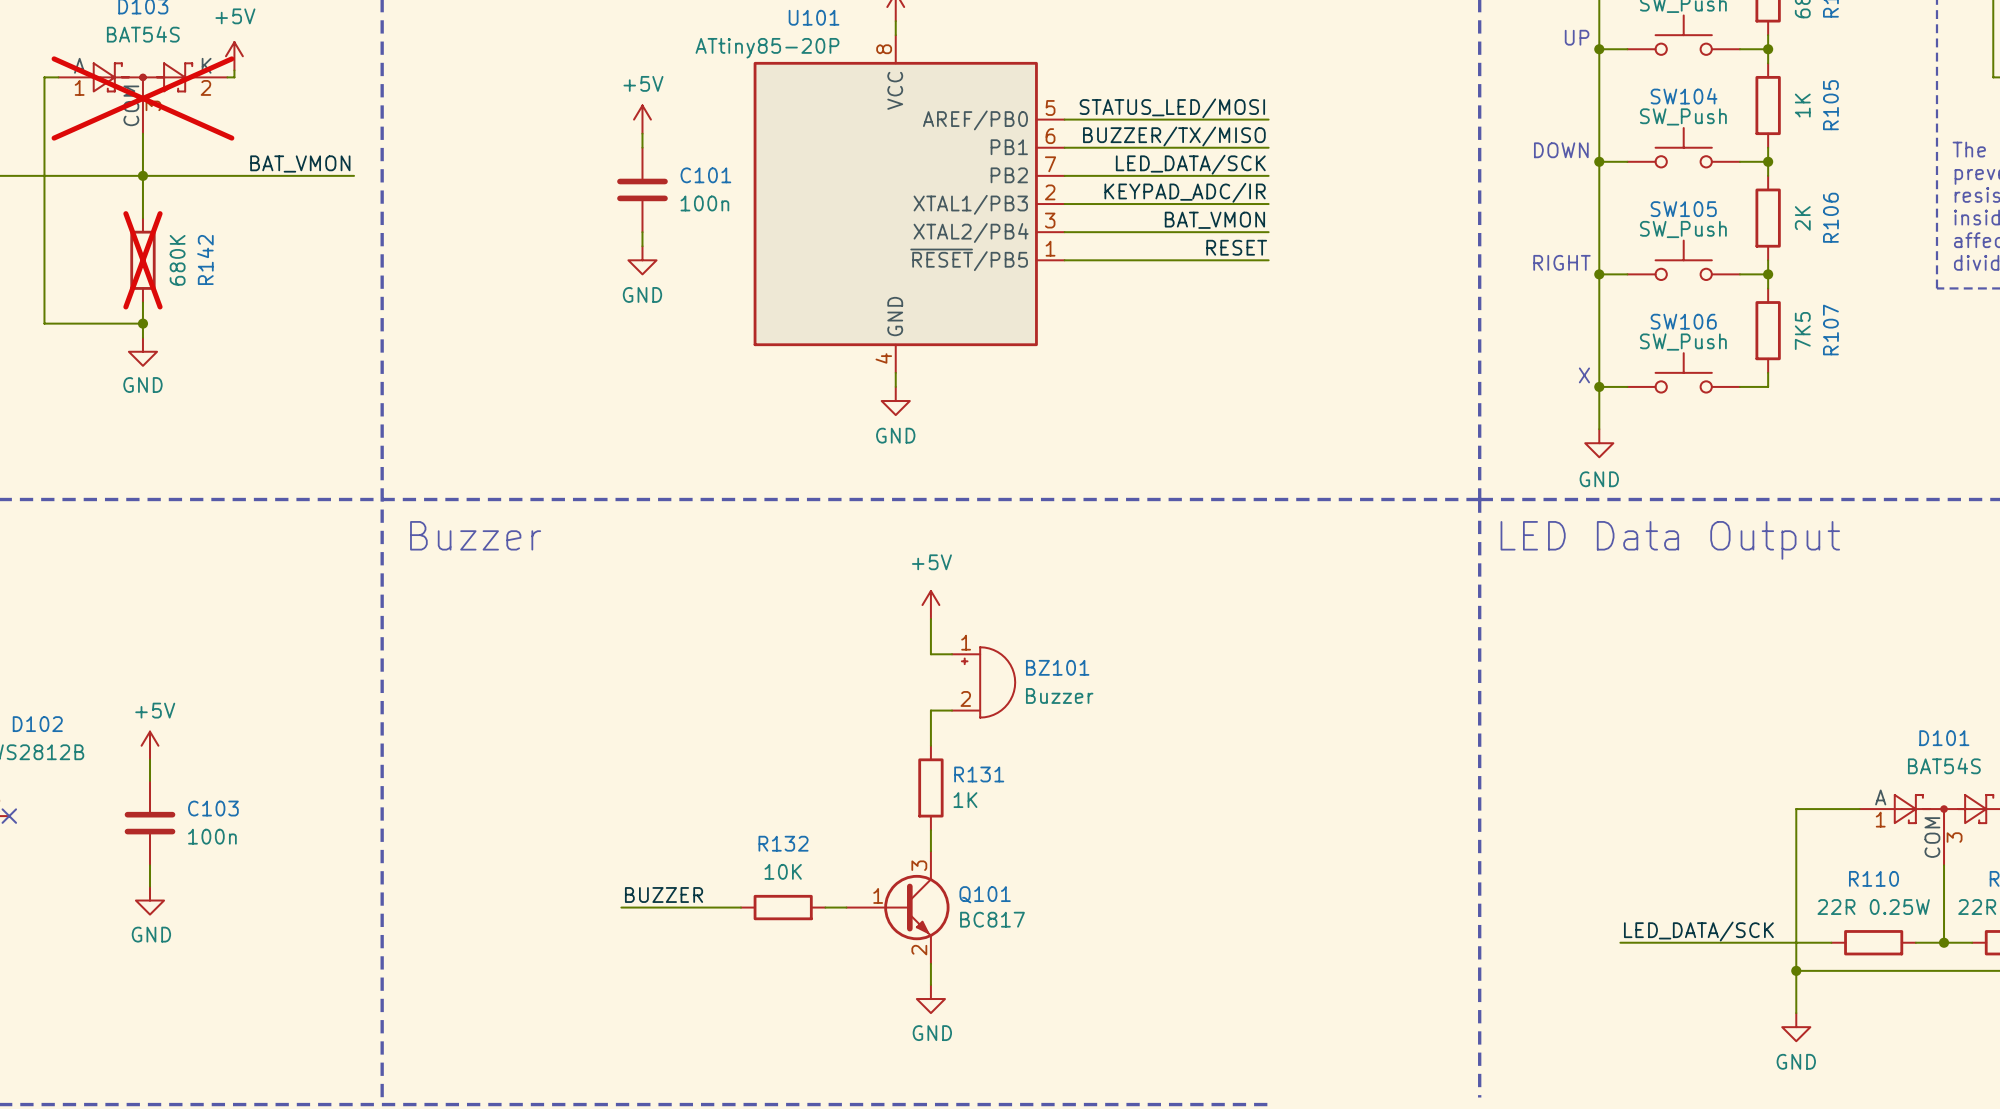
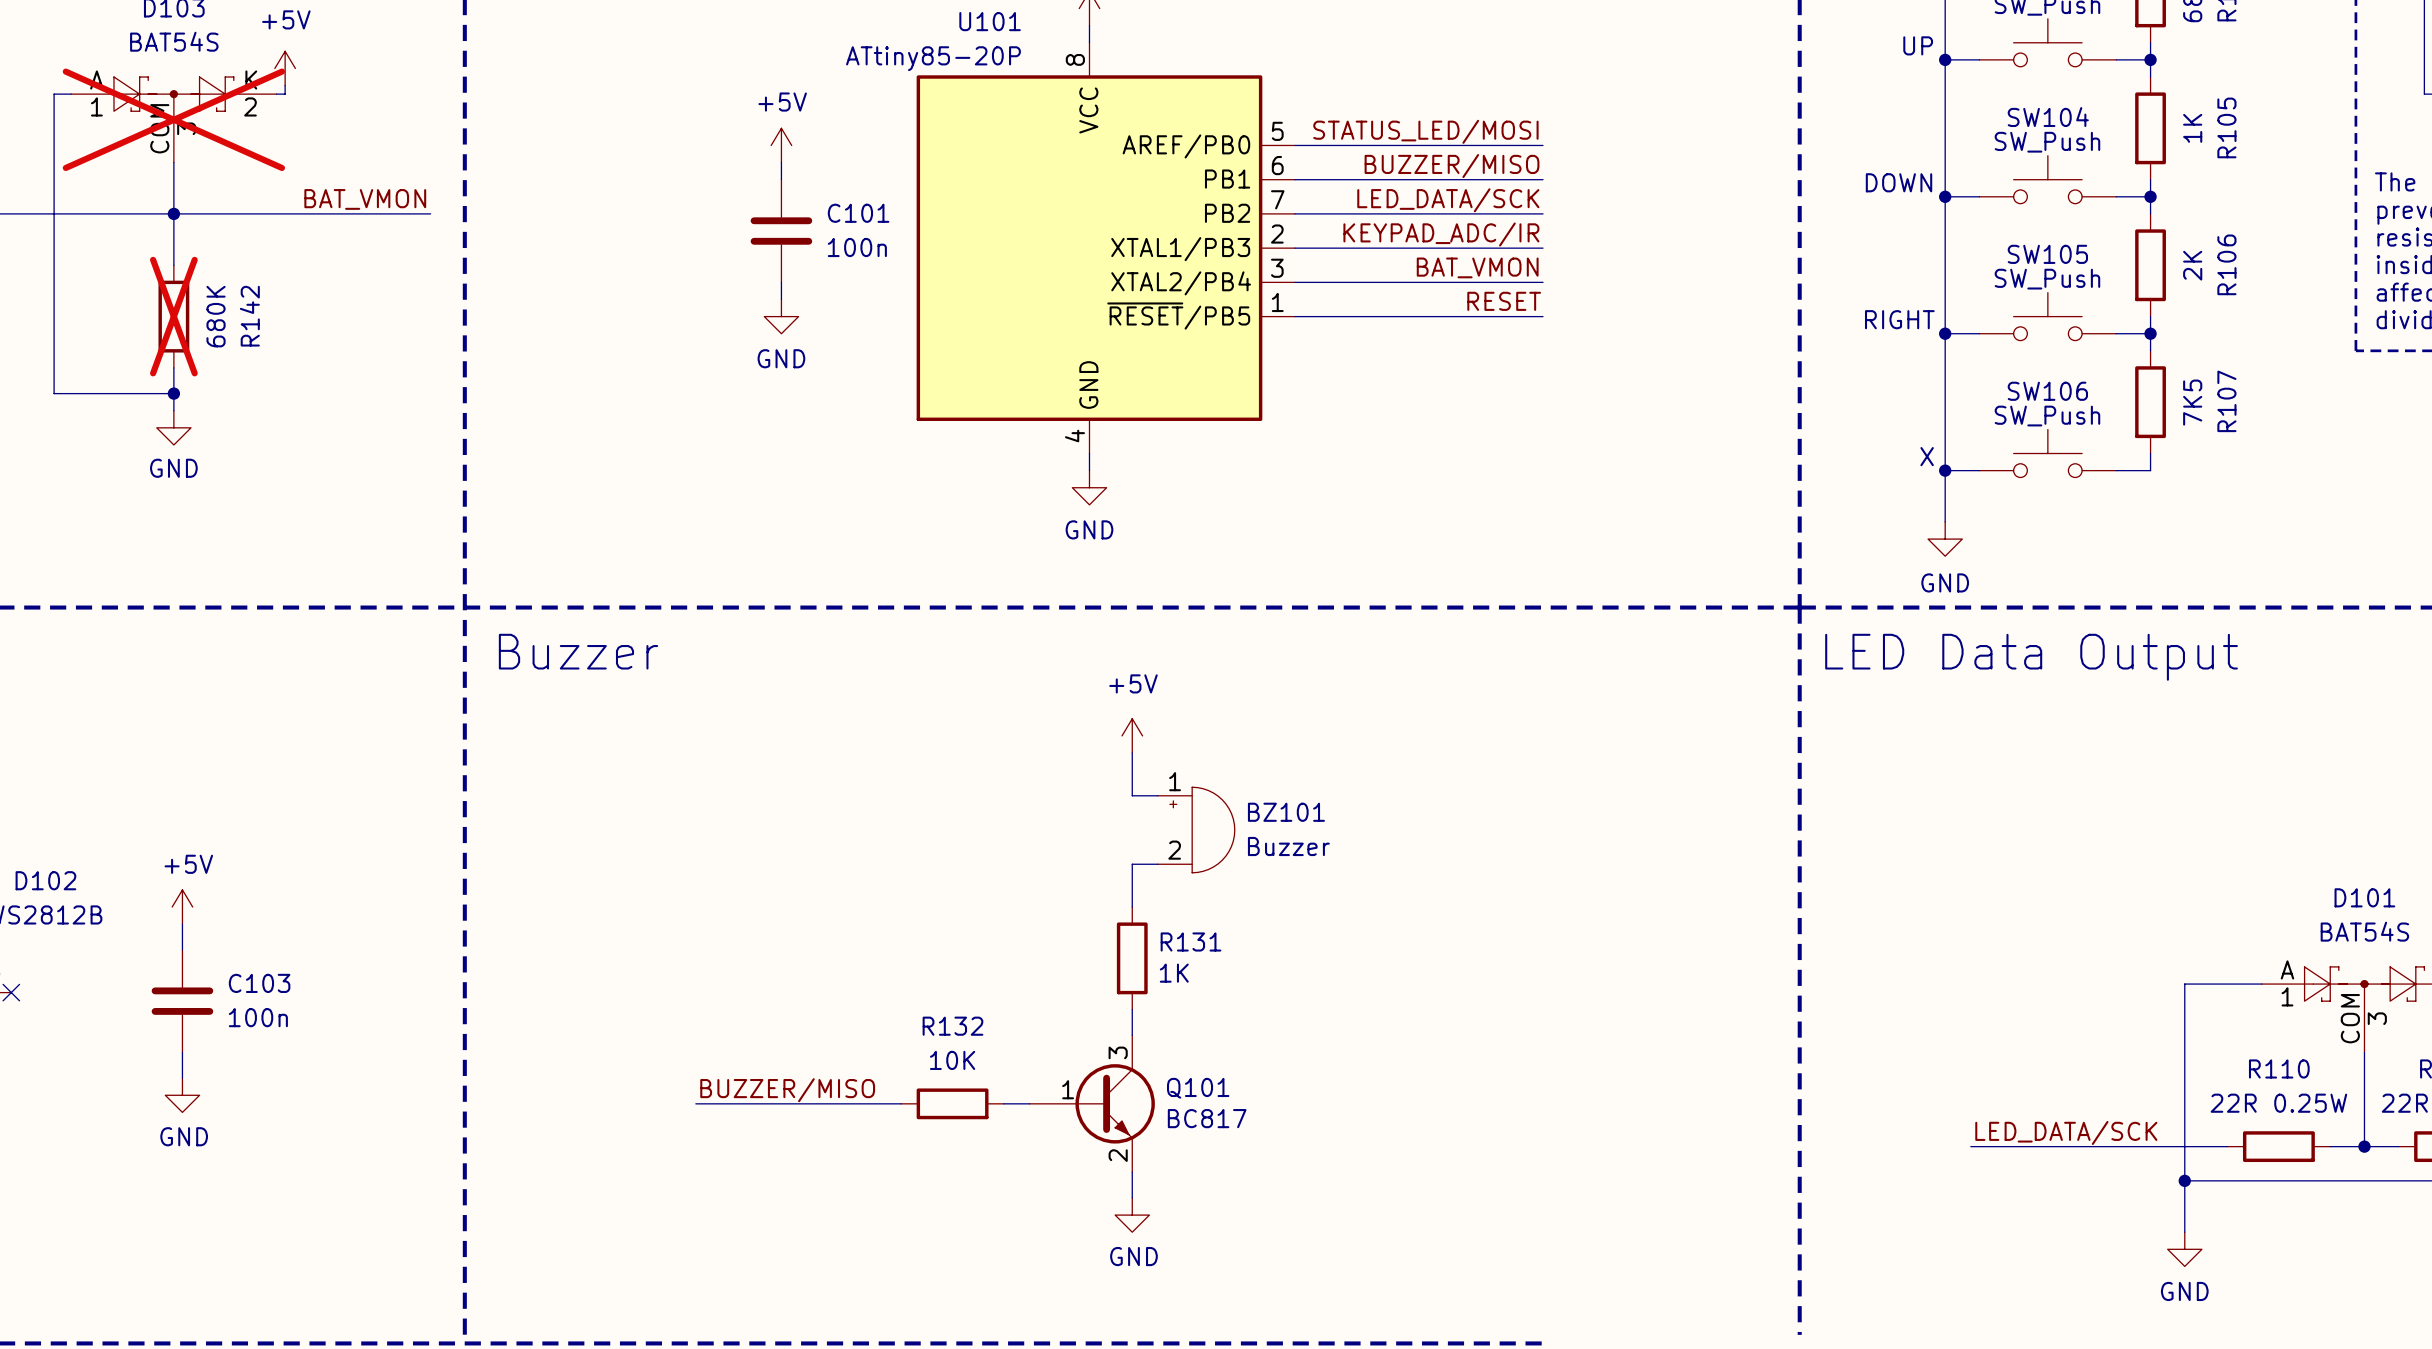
label: BUZZER/TX/MISO (1174, 136) -> BUZZER/MISO (1452, 166)
label: BUZZER (664, 895) -> BUZZER/MISO (787, 1090)
wire: none -> (695, 1103) (755, 1103)

